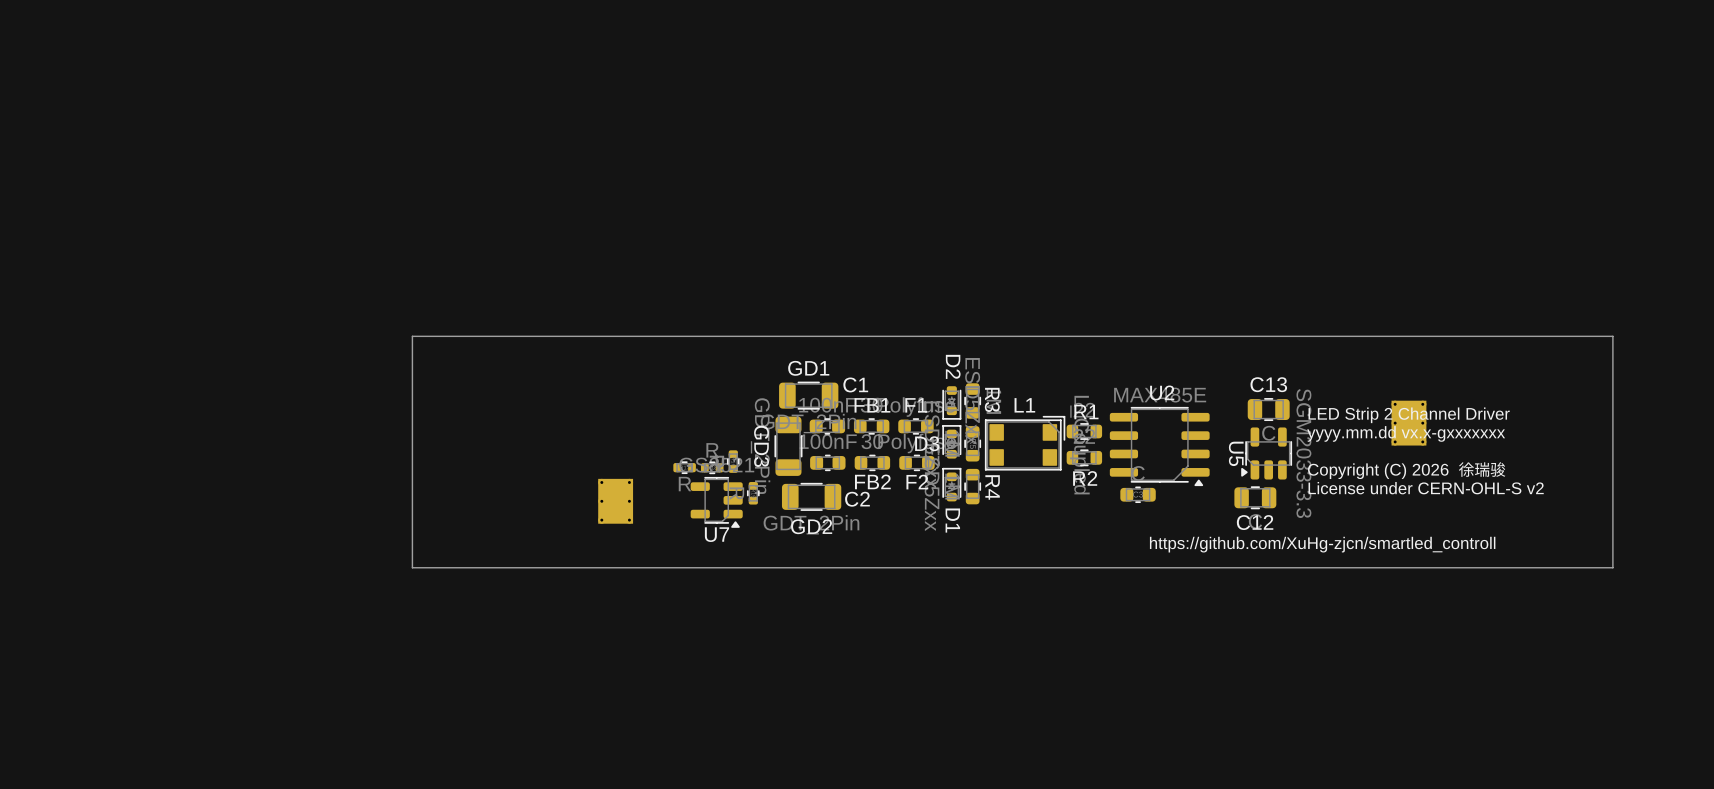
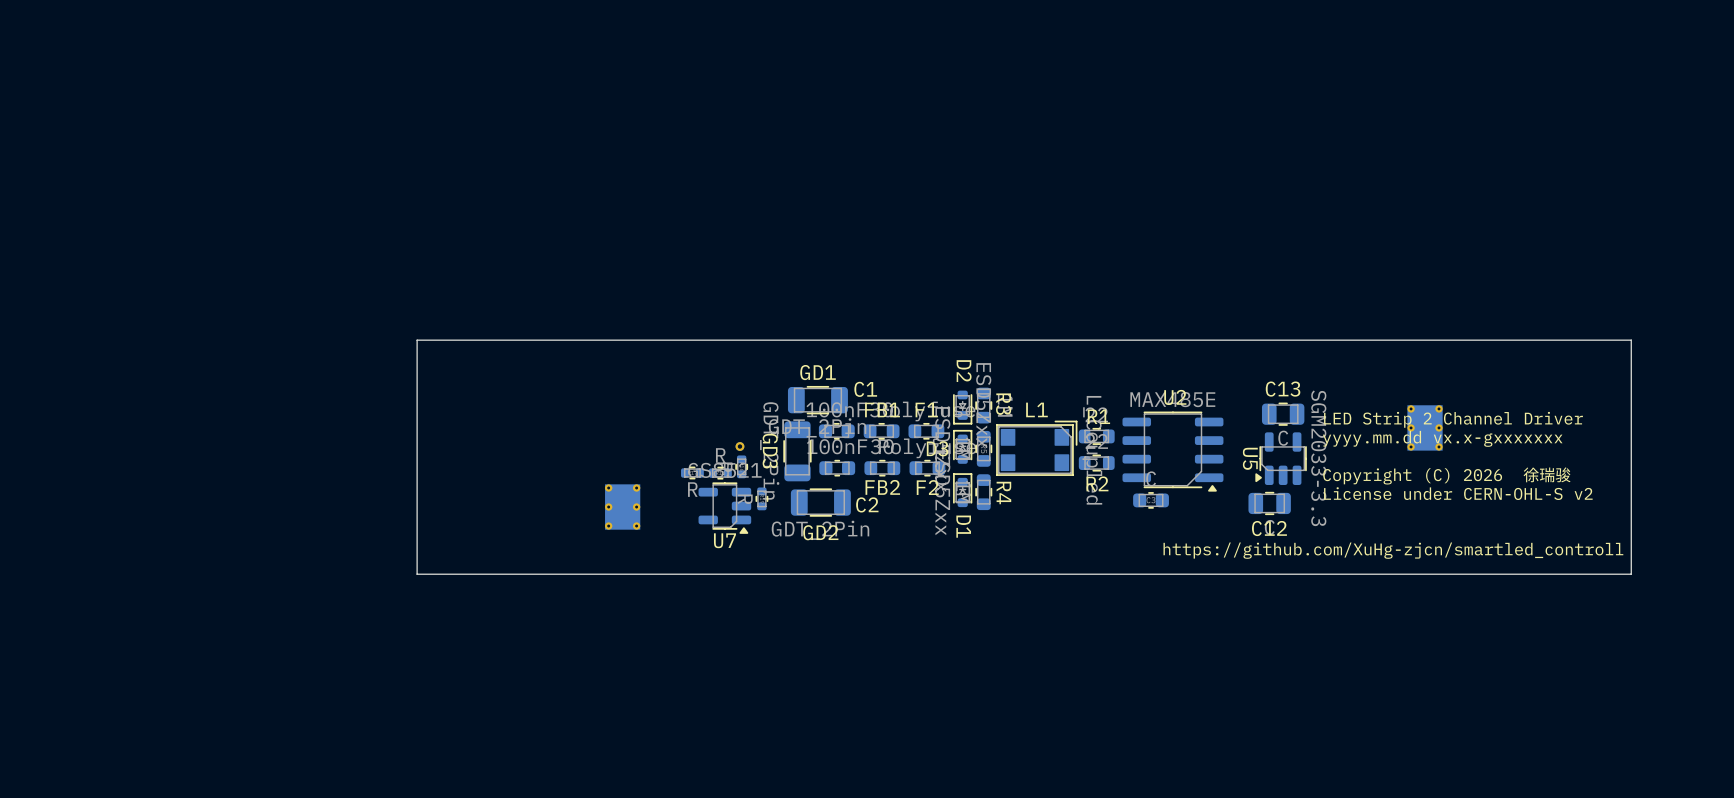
part: none -> (739, 446)

